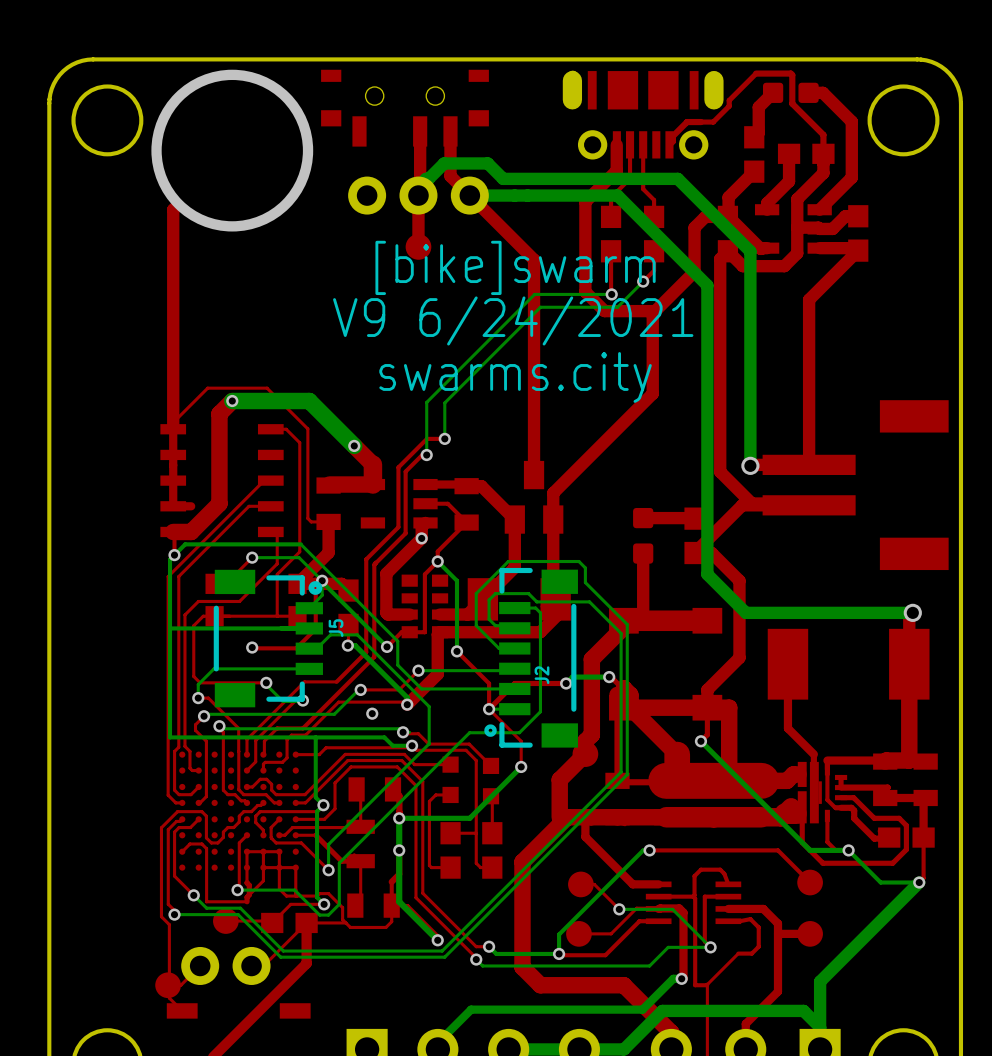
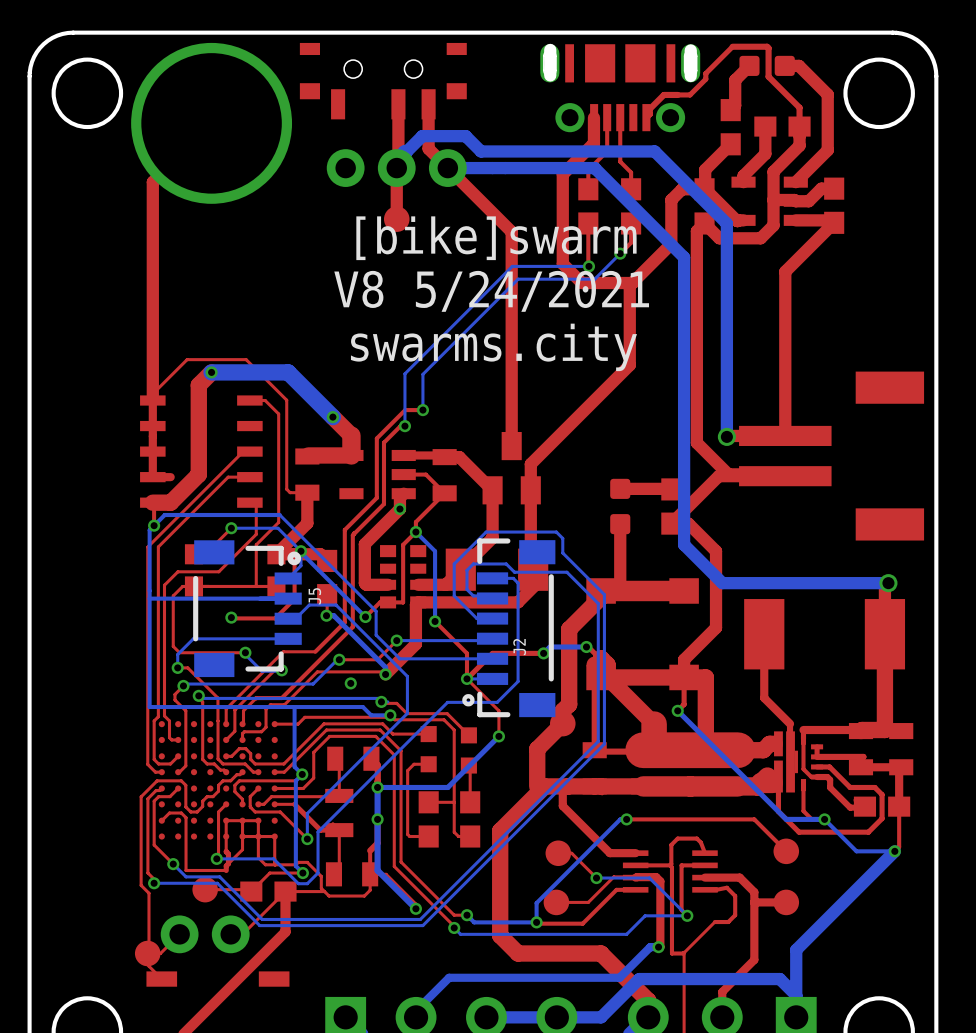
text: V9 6/24/2021 (513, 320) -> V8 5/24/2021 (491, 291)

